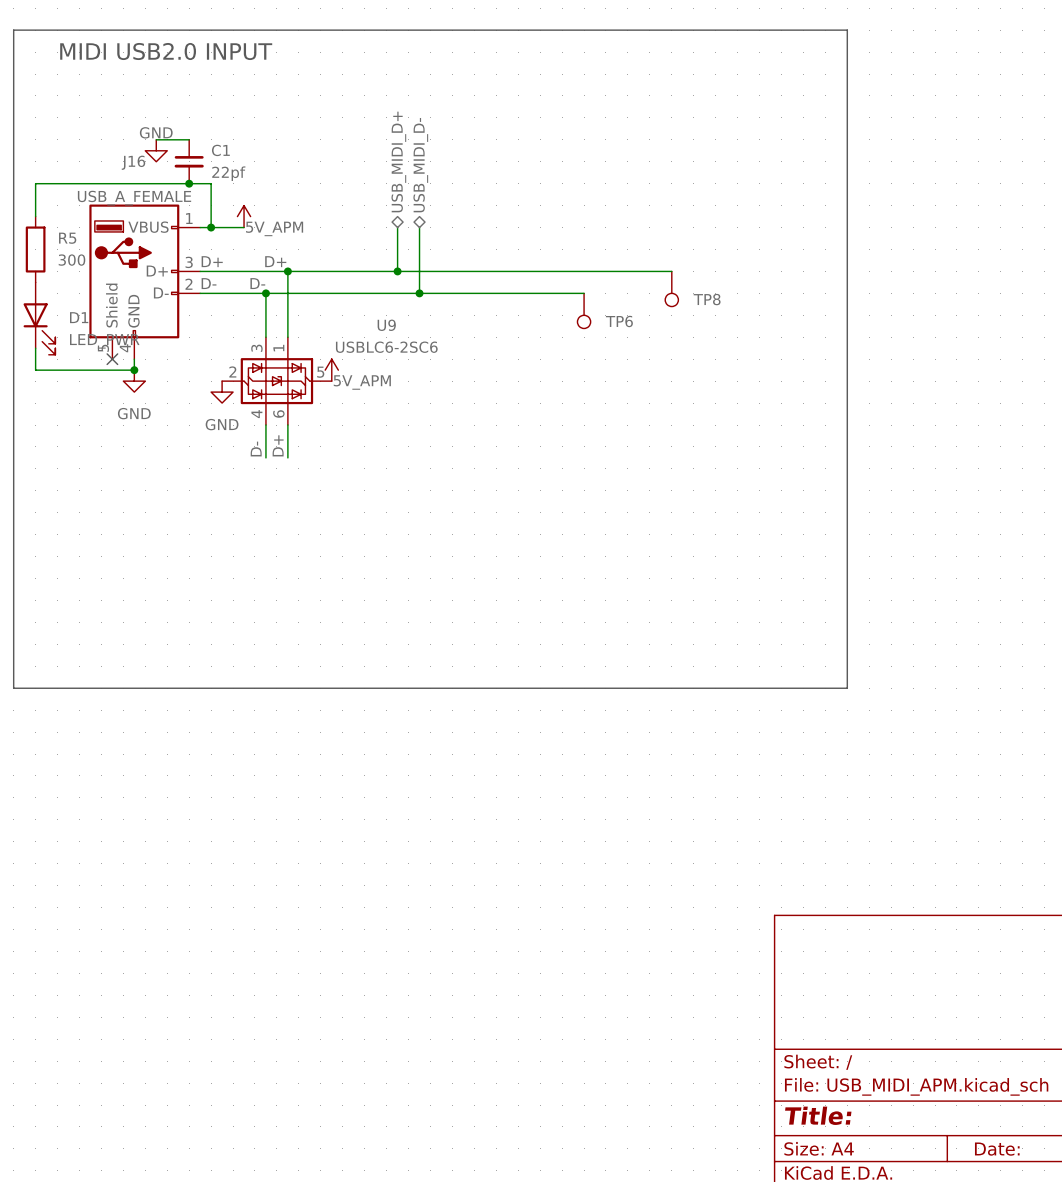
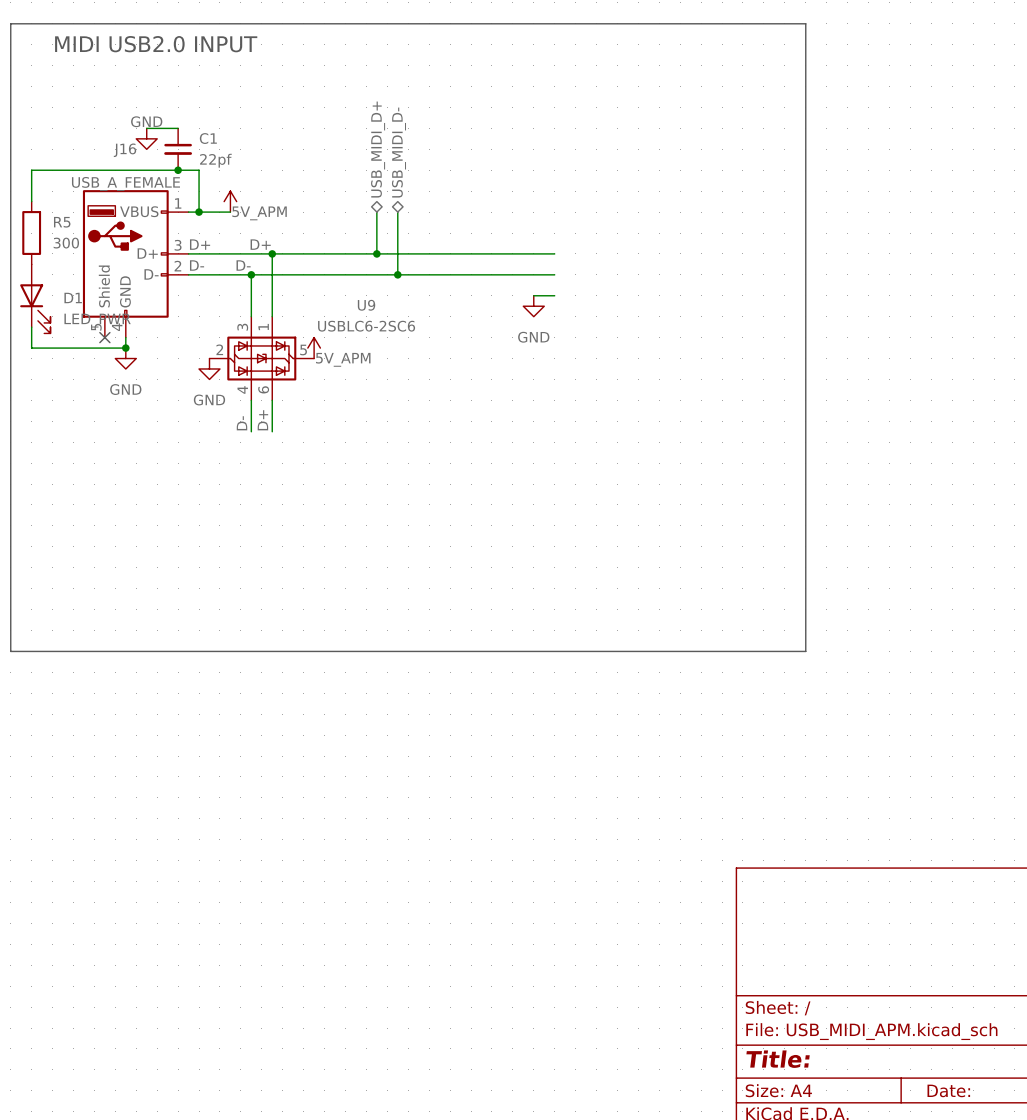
wire: (584, 271) (671, 271) -> none
TP8: (671, 288) -> none
TP6: (584, 310) -> none
wire: none -> (533, 295) (554, 295)
power symbol: none -> GND (533, 306)

